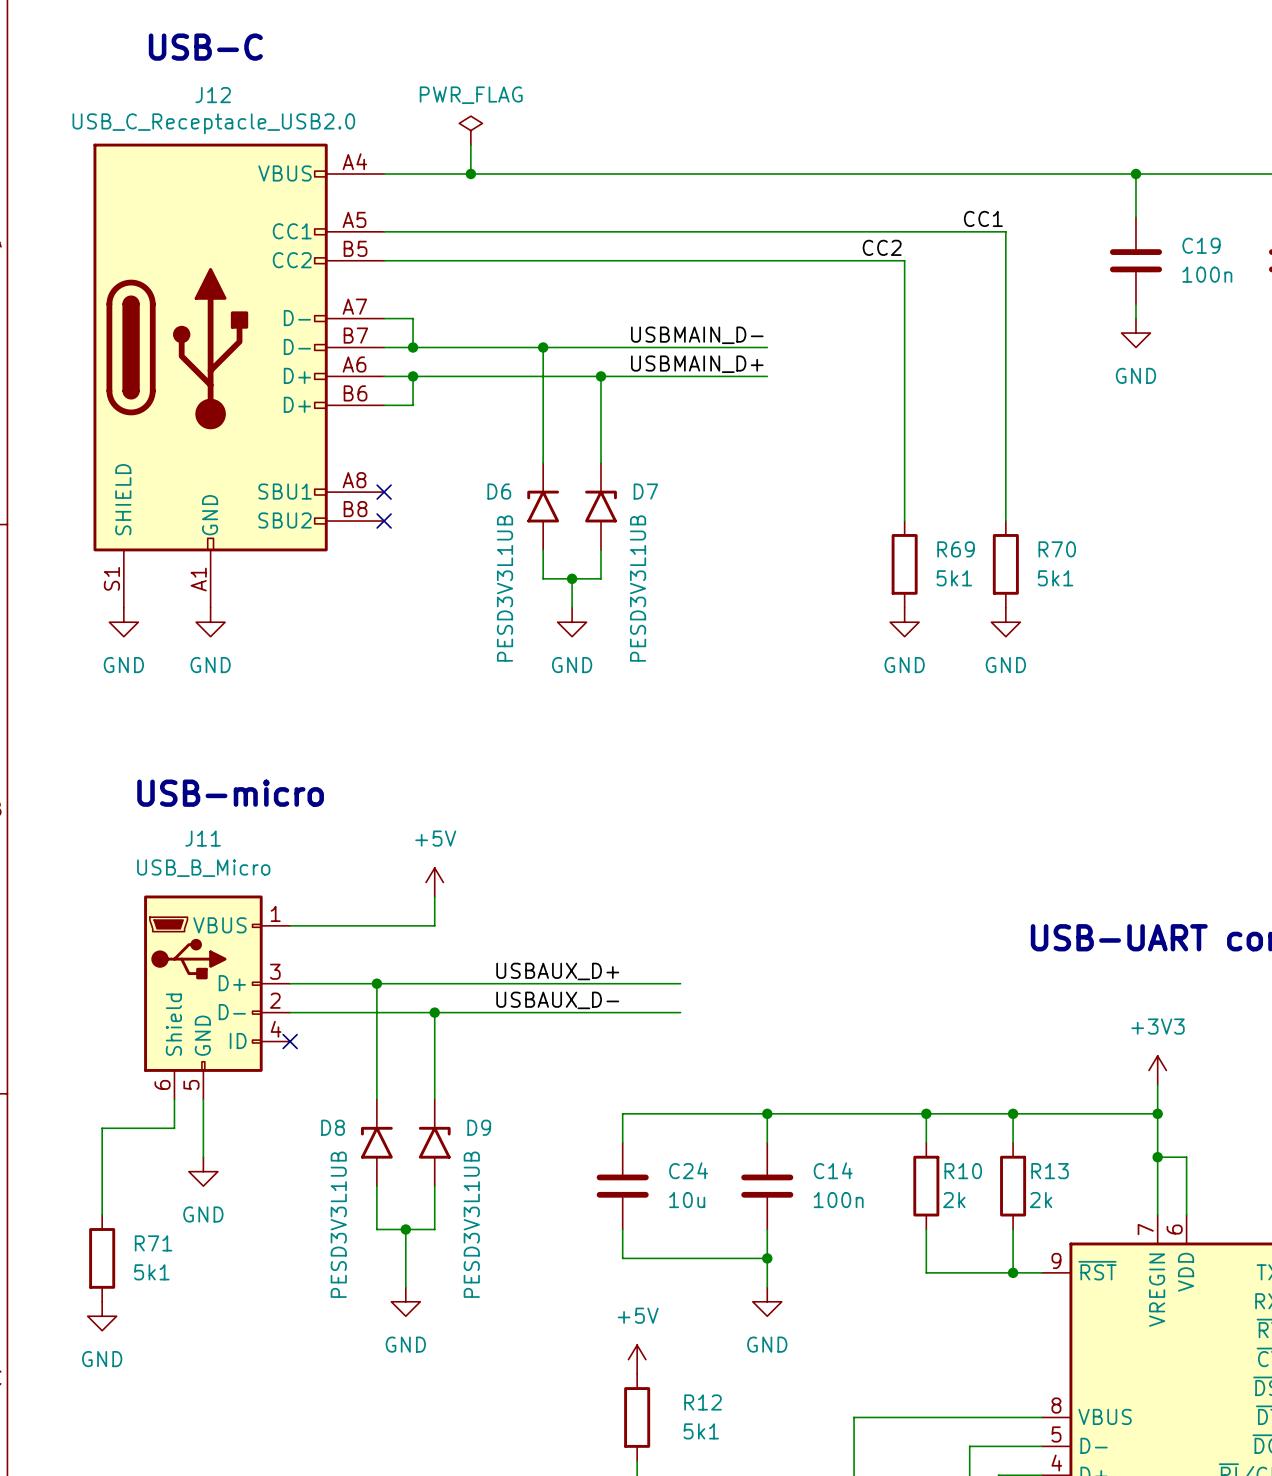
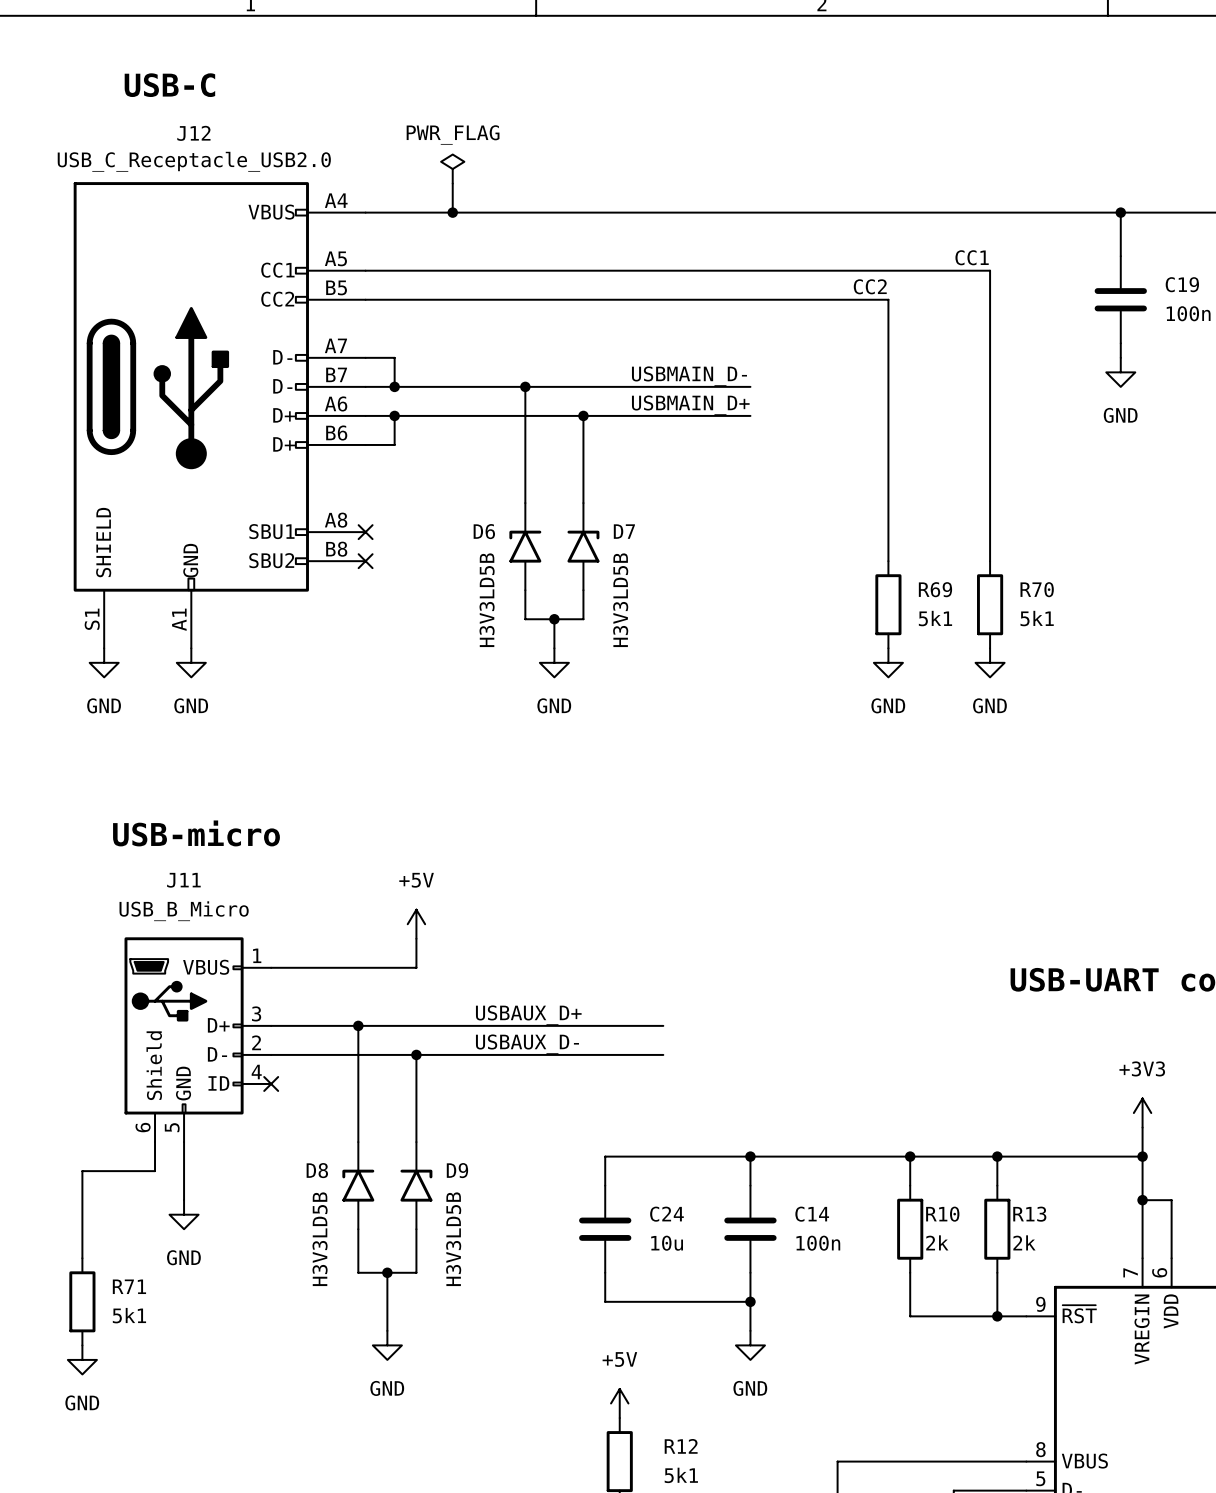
D6 value: PESD3V3L1UB (505, 588) -> H3V3LD5B (487, 600)
D7 value: PESD3V3L1UB (638, 588) -> H3V3LD5B (620, 600)
D8 value: PESD3V3L1UB (338, 1224) -> H3V3LD5B (320, 1239)
D9 value: PESD3V3L1UB (471, 1224) -> H3V3LD5B (453, 1239)

